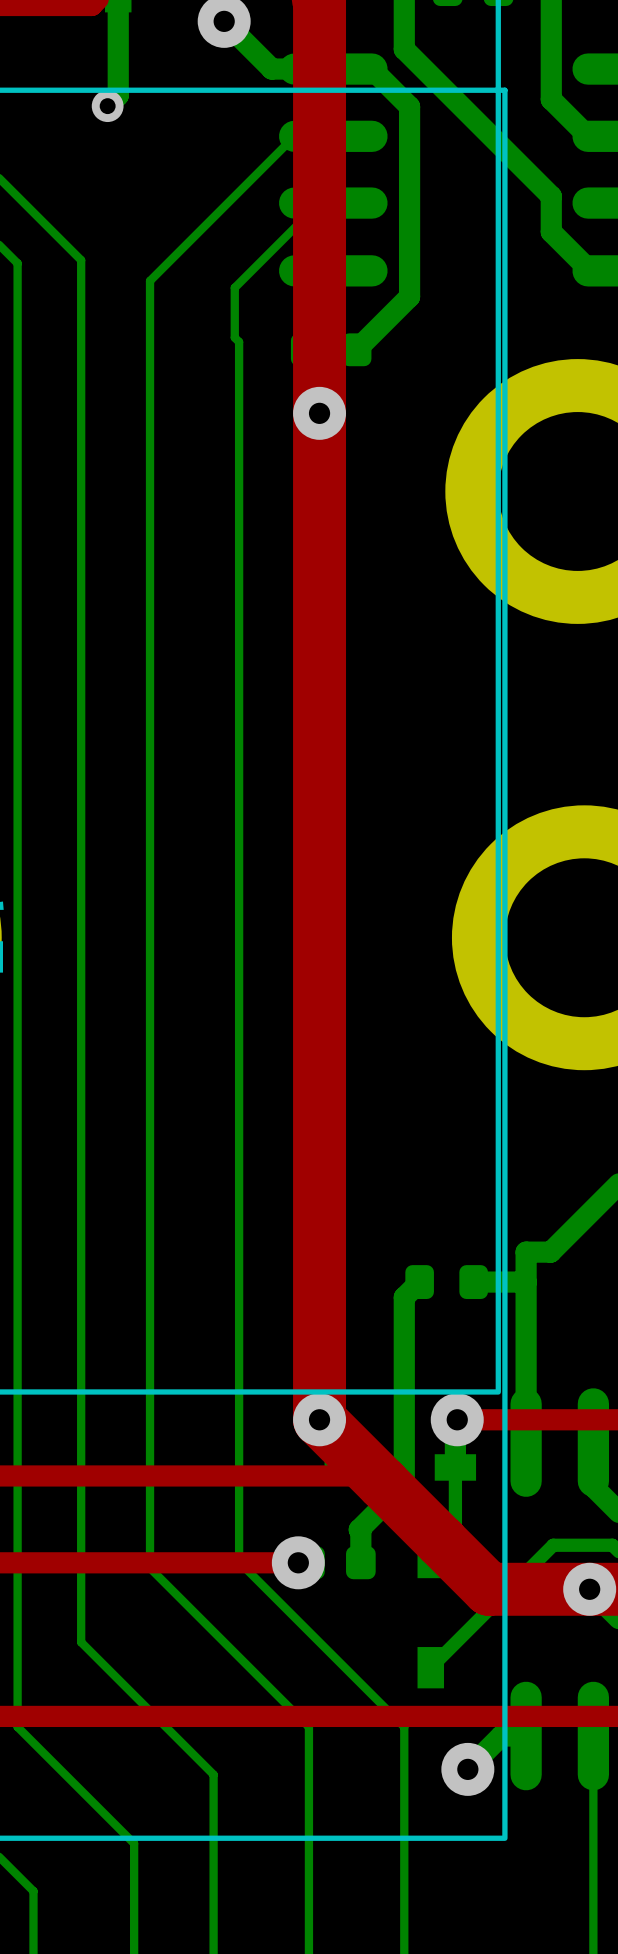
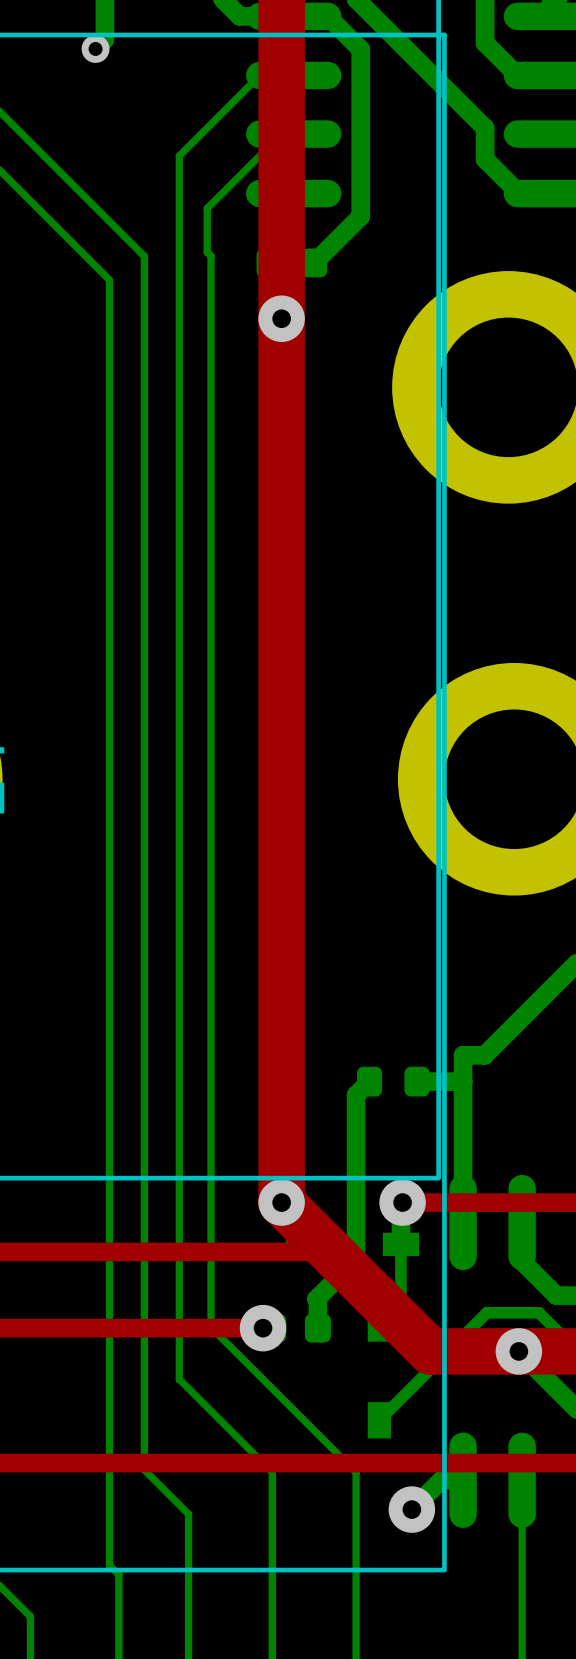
bottom track: (203, 227) (150, 280) (150, 1568) (203, 1621) -> (179, 155) (179, 1379)
bottom track: (81, 260) (81, 1642) (163, 1724) -> (72, 184) (144, 256) (144, 1470)
bottom track: (17, 263) (17, 1727) (123, 1832) -> (16, 187) (109, 280) (109, 1565)

